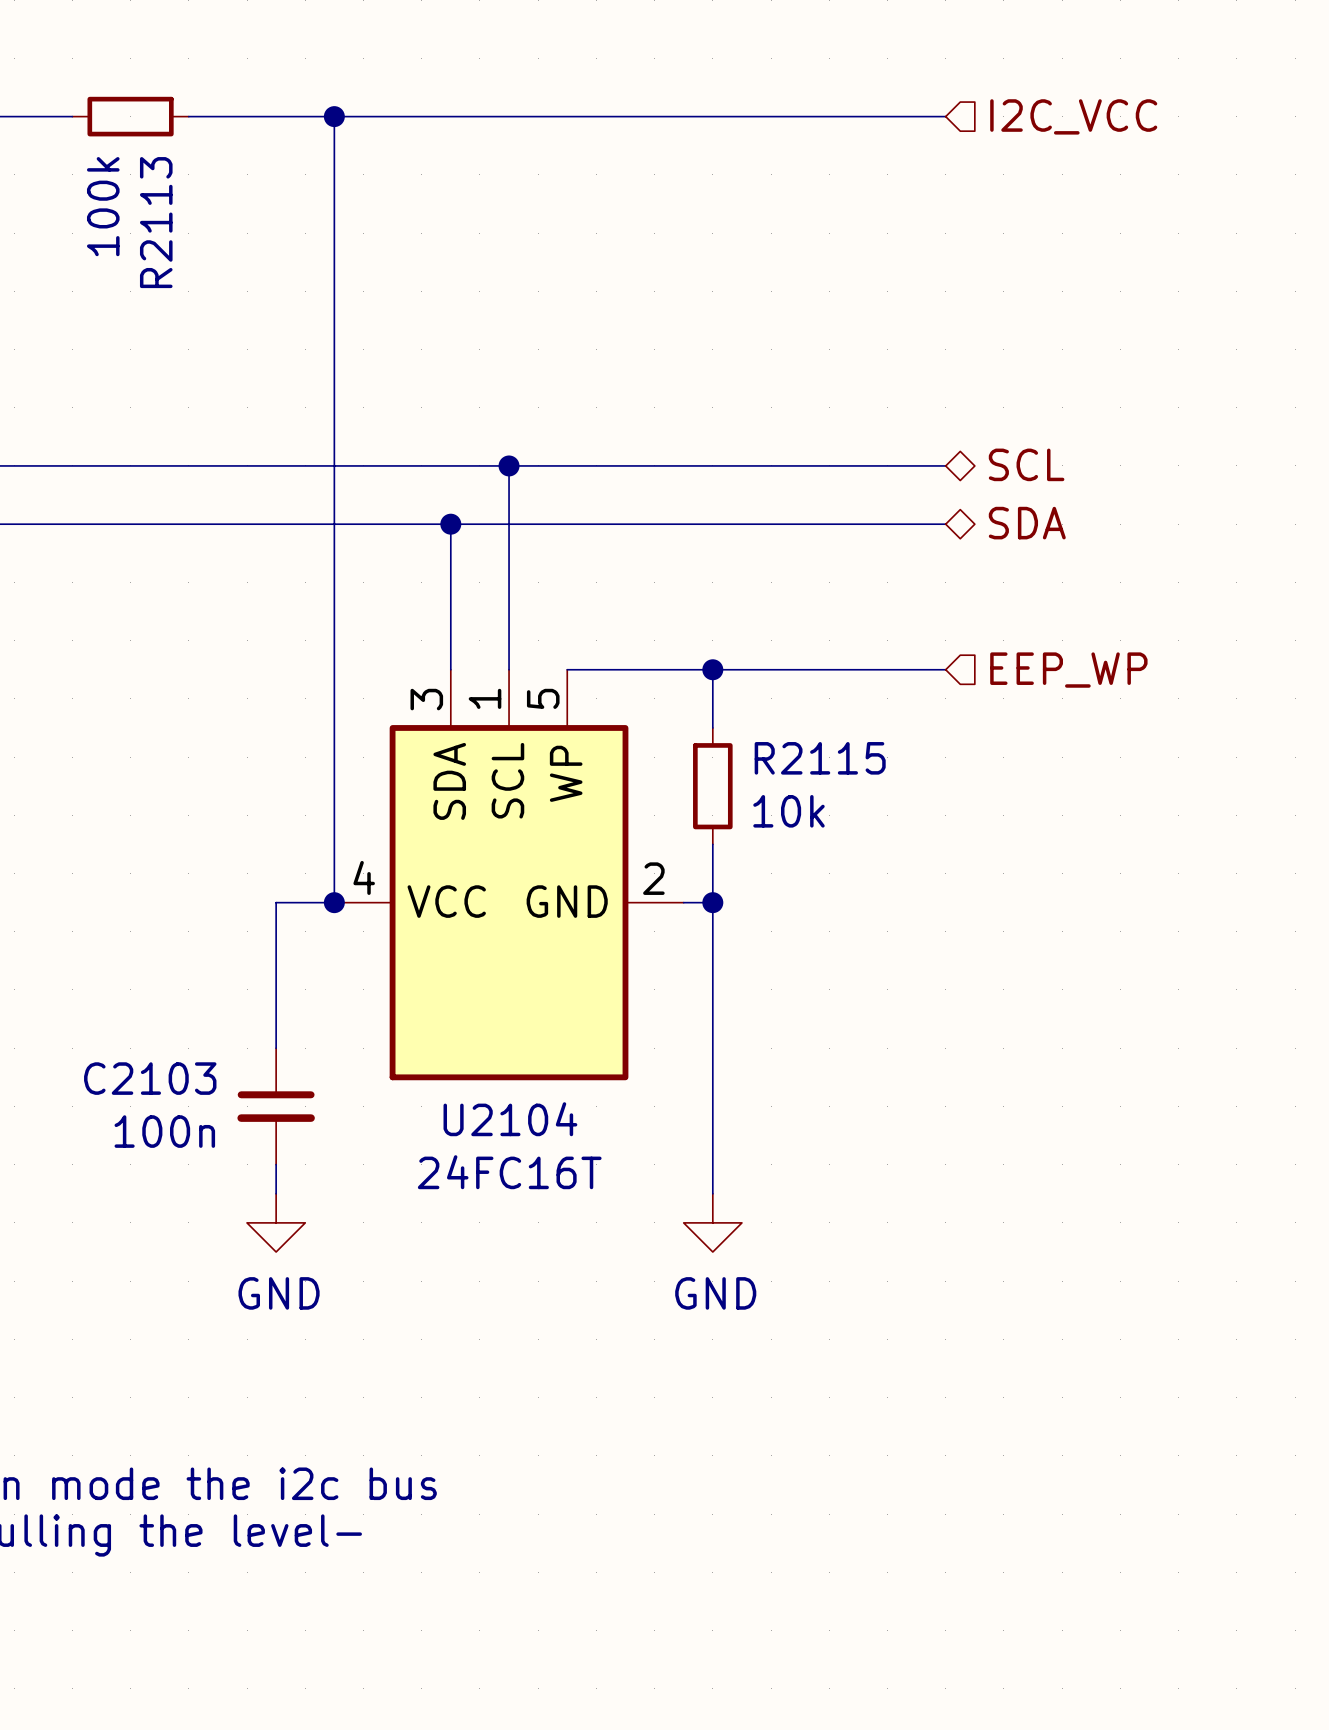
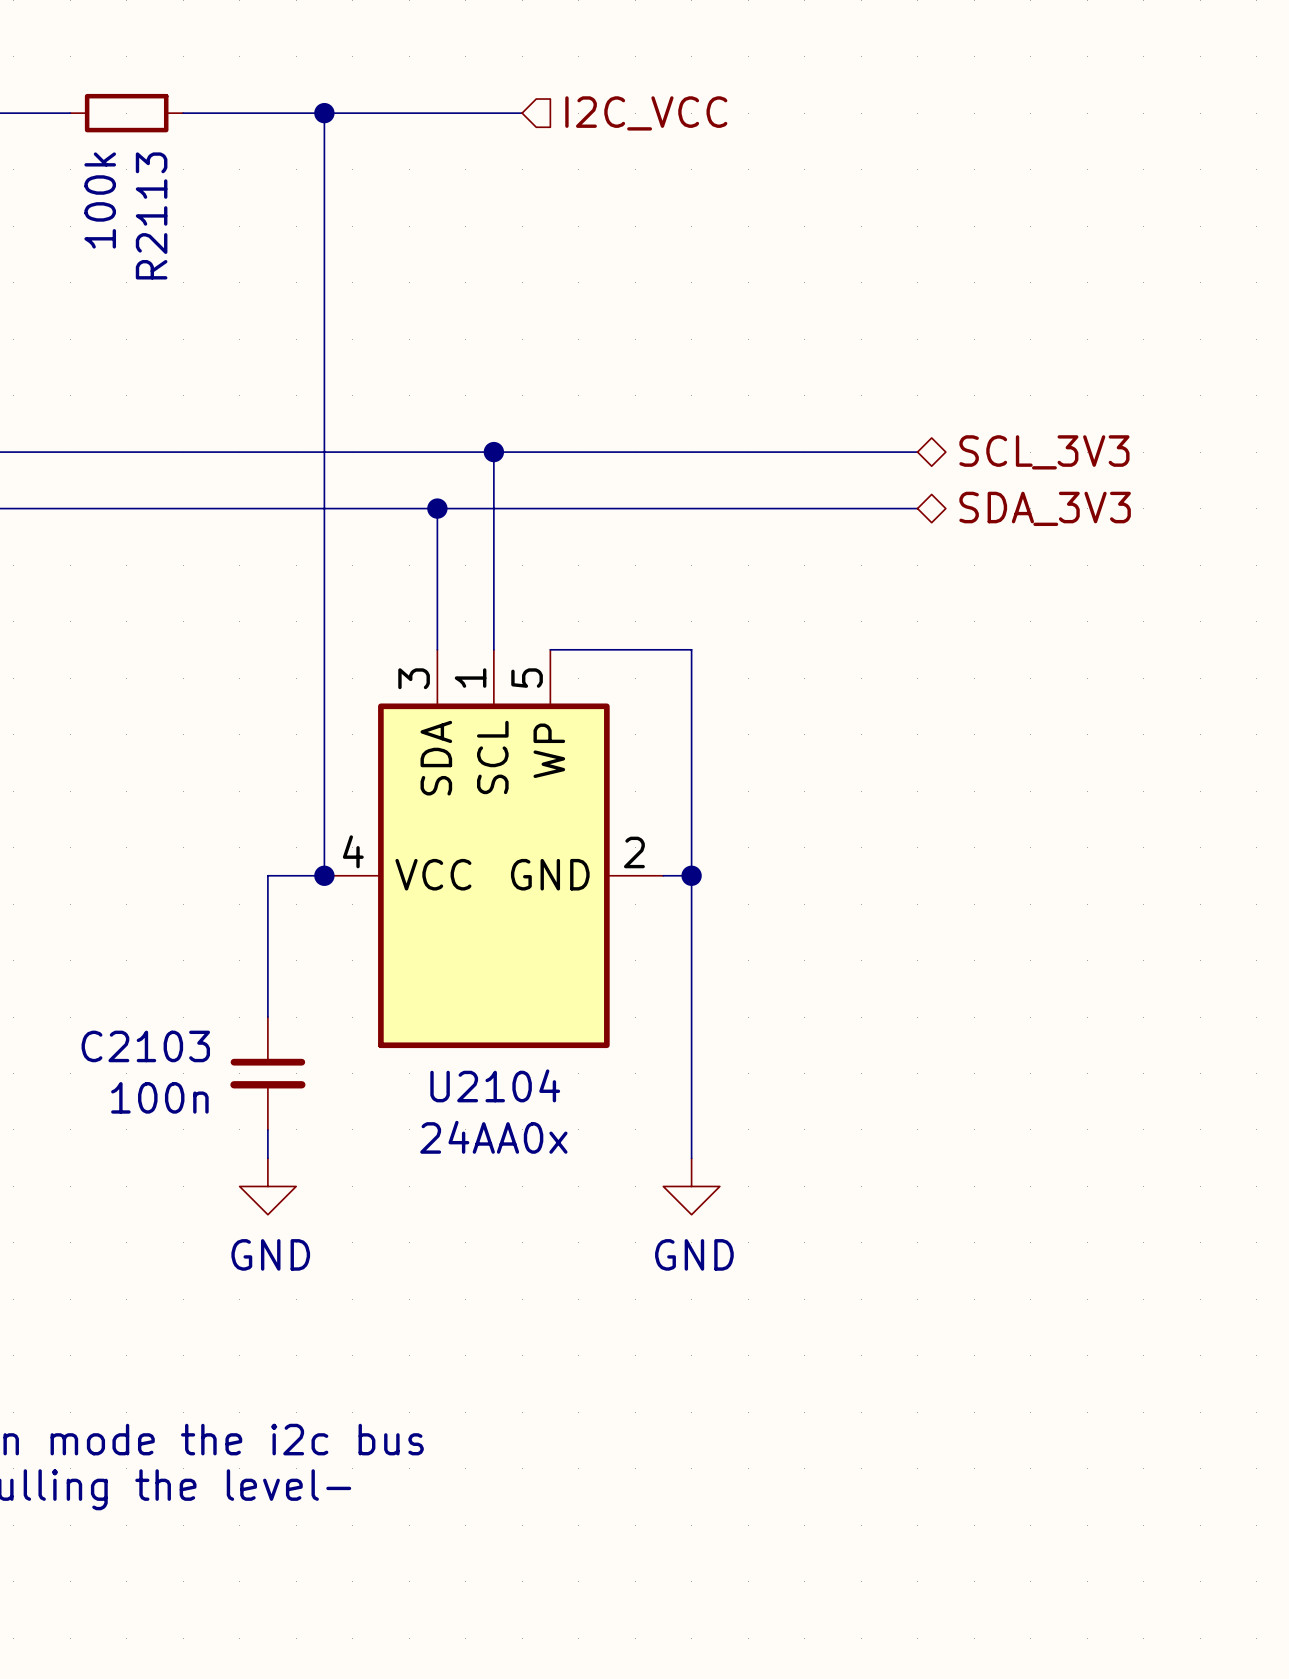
wire: (538, 116) (945, 116) -> none
hierarchical label position: I2C_VCC (1073, 116) -> I2C_VCC (646, 113)
hierarchical label: SCL (1026, 464) -> SCL_3V3 (1044, 452)
hierarchical label: SDA (1027, 523) -> SDA_3V3 (1045, 508)
wire: (712, 669) (945, 669) -> none
junction: (712, 669) -> none
hierarchical label: EEP_WP (1068, 670) -> none
wire: none -> (691, 706) (691, 819)
R2115: 10k (712, 786) -> none
U2104 value: 24FC16T (509, 1172) -> 24AA0x (493, 1137)

